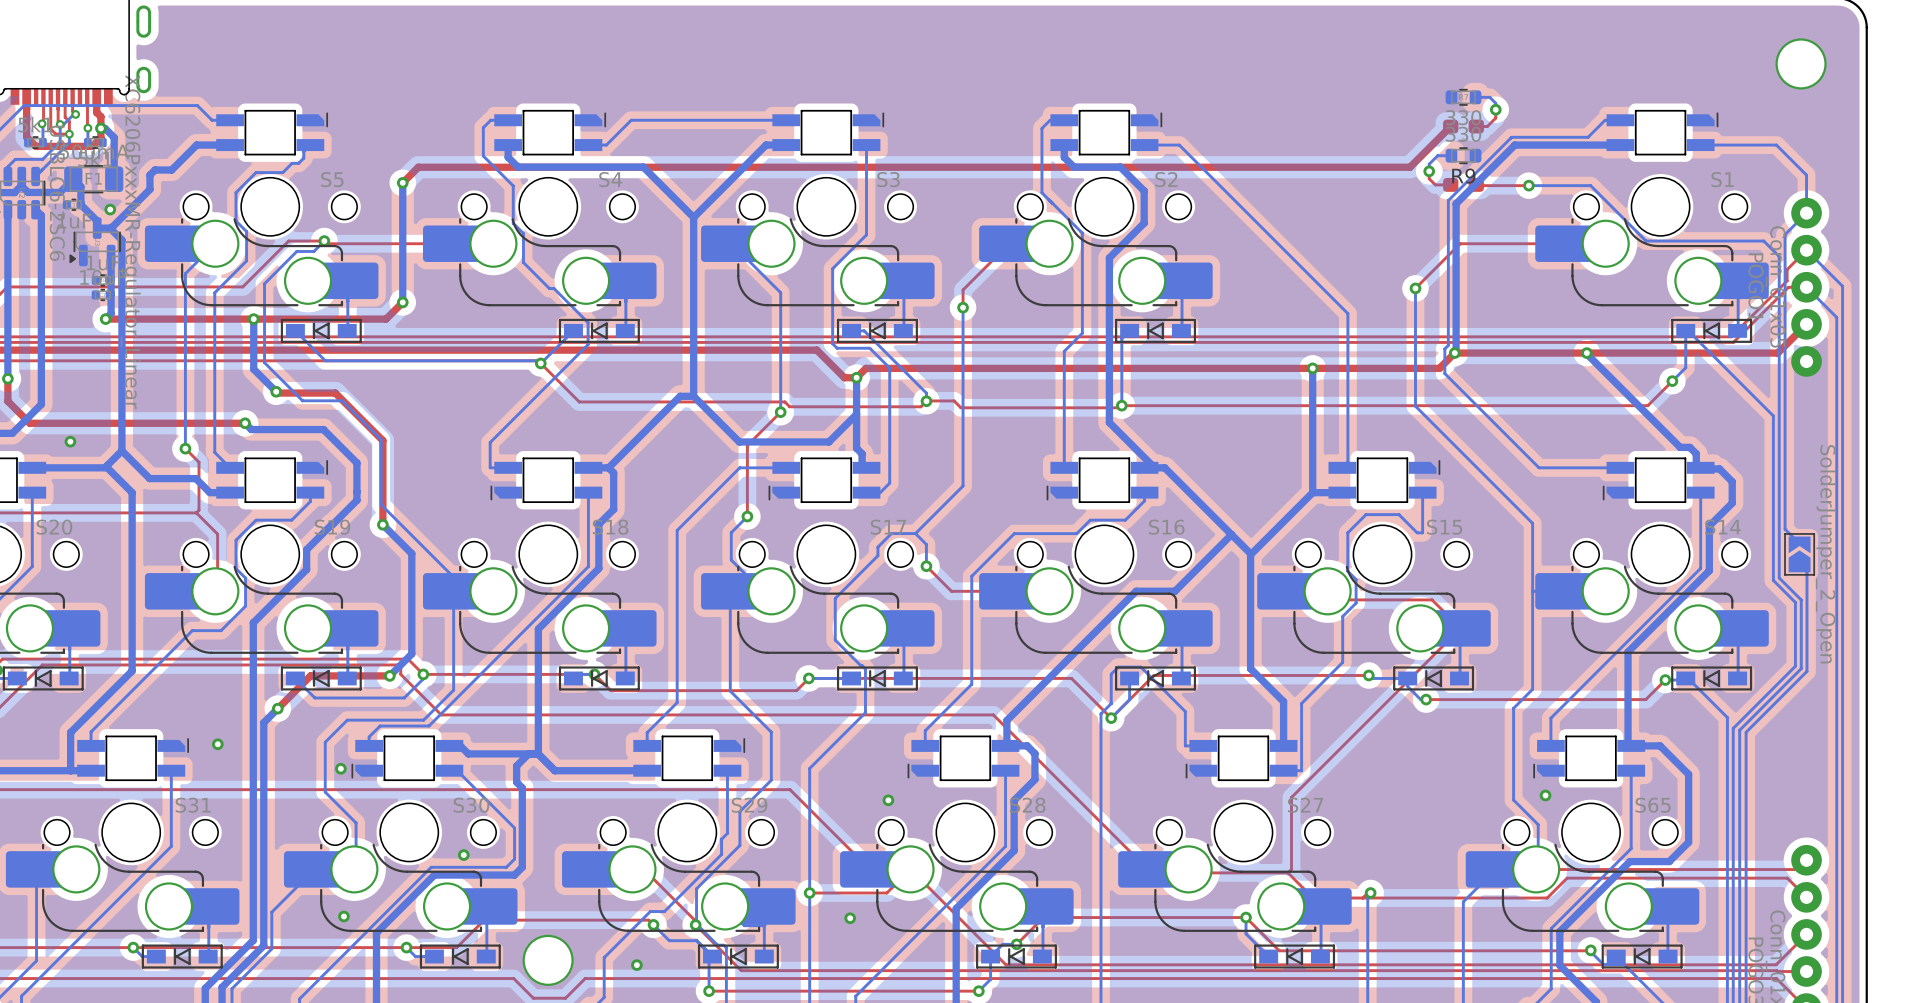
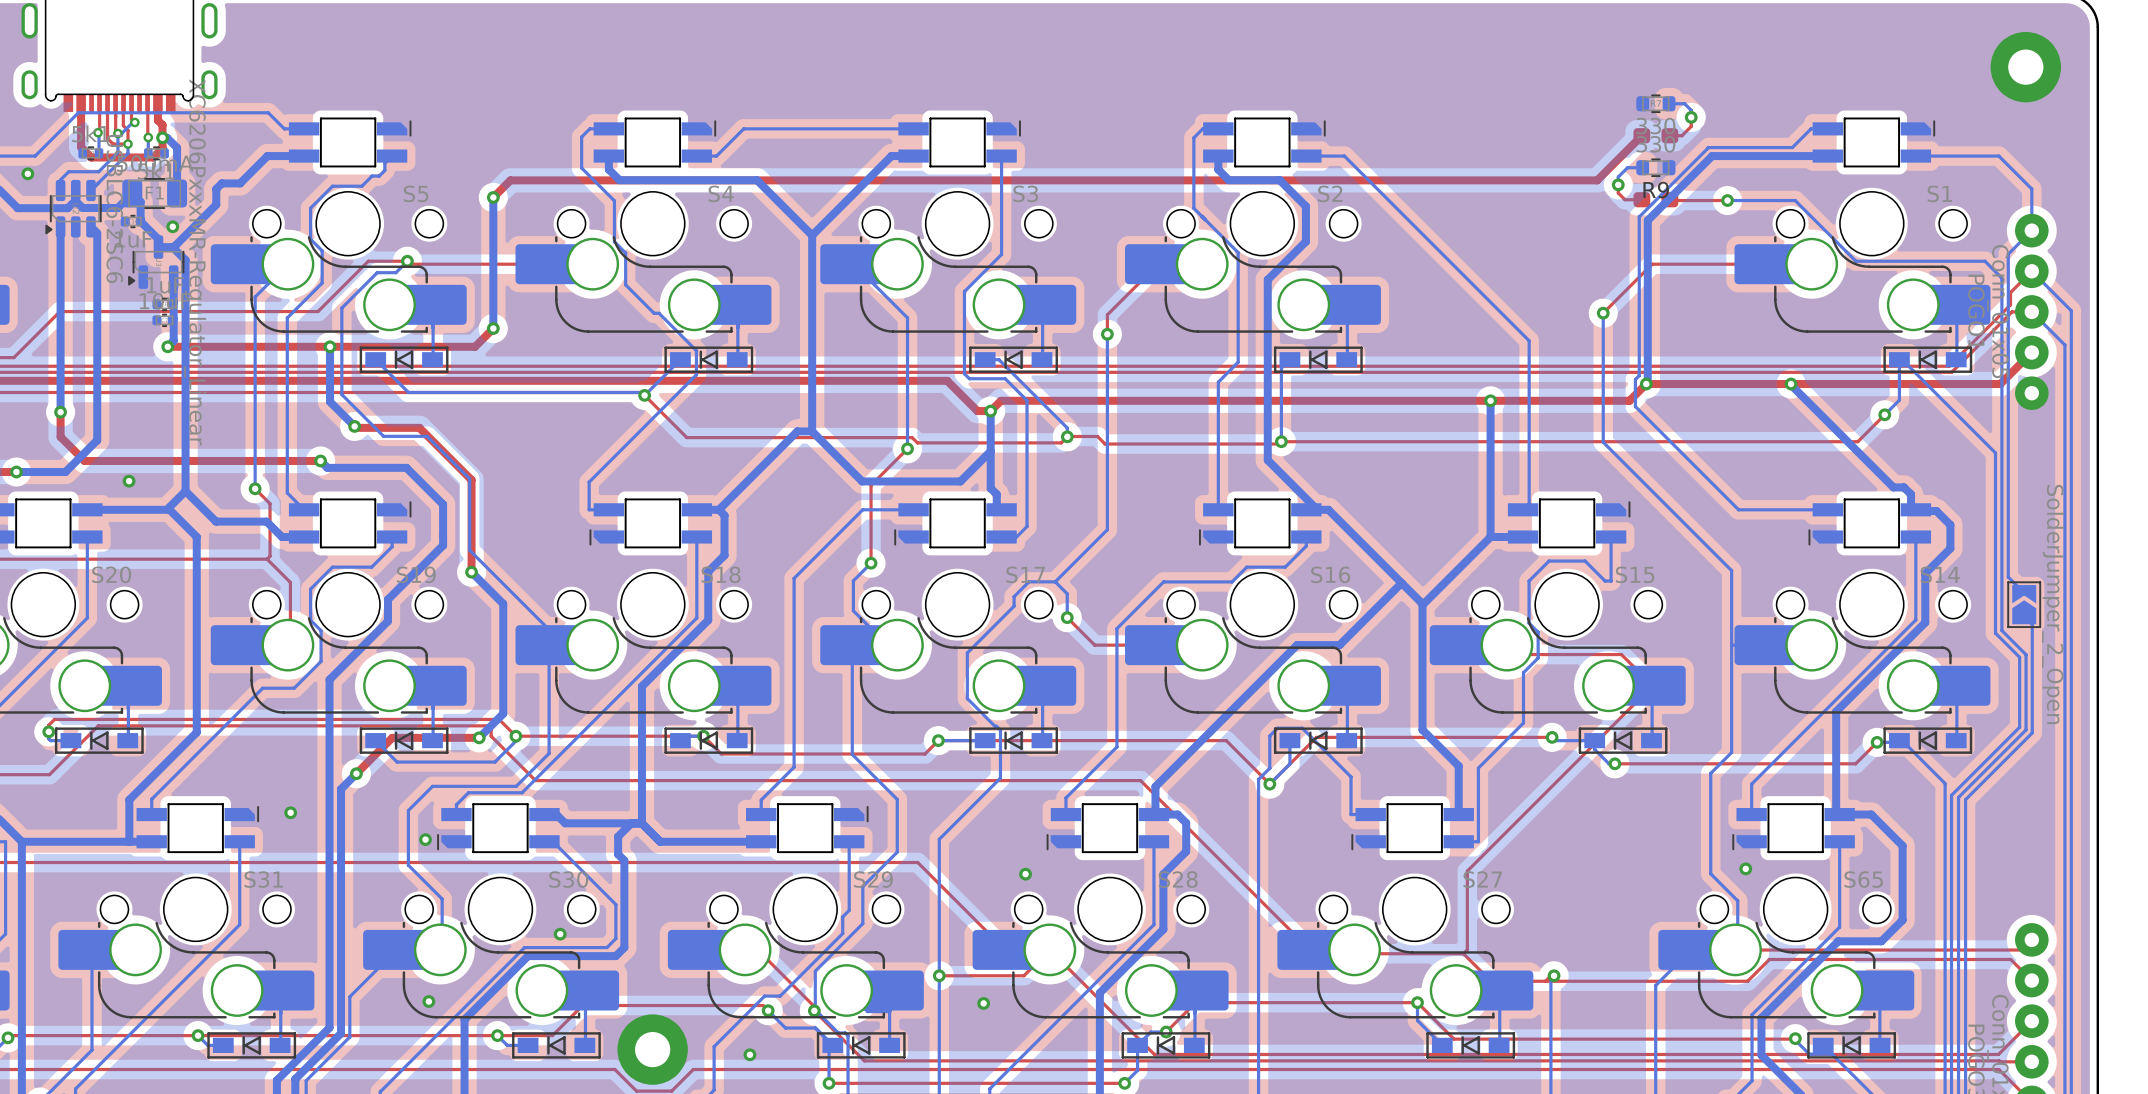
part footprint: [1775, 38, 1827, 90] -> [1990, 31, 2062, 103]
part footprint: [522, 934, 574, 986] -> [617, 1014, 688, 1085]

